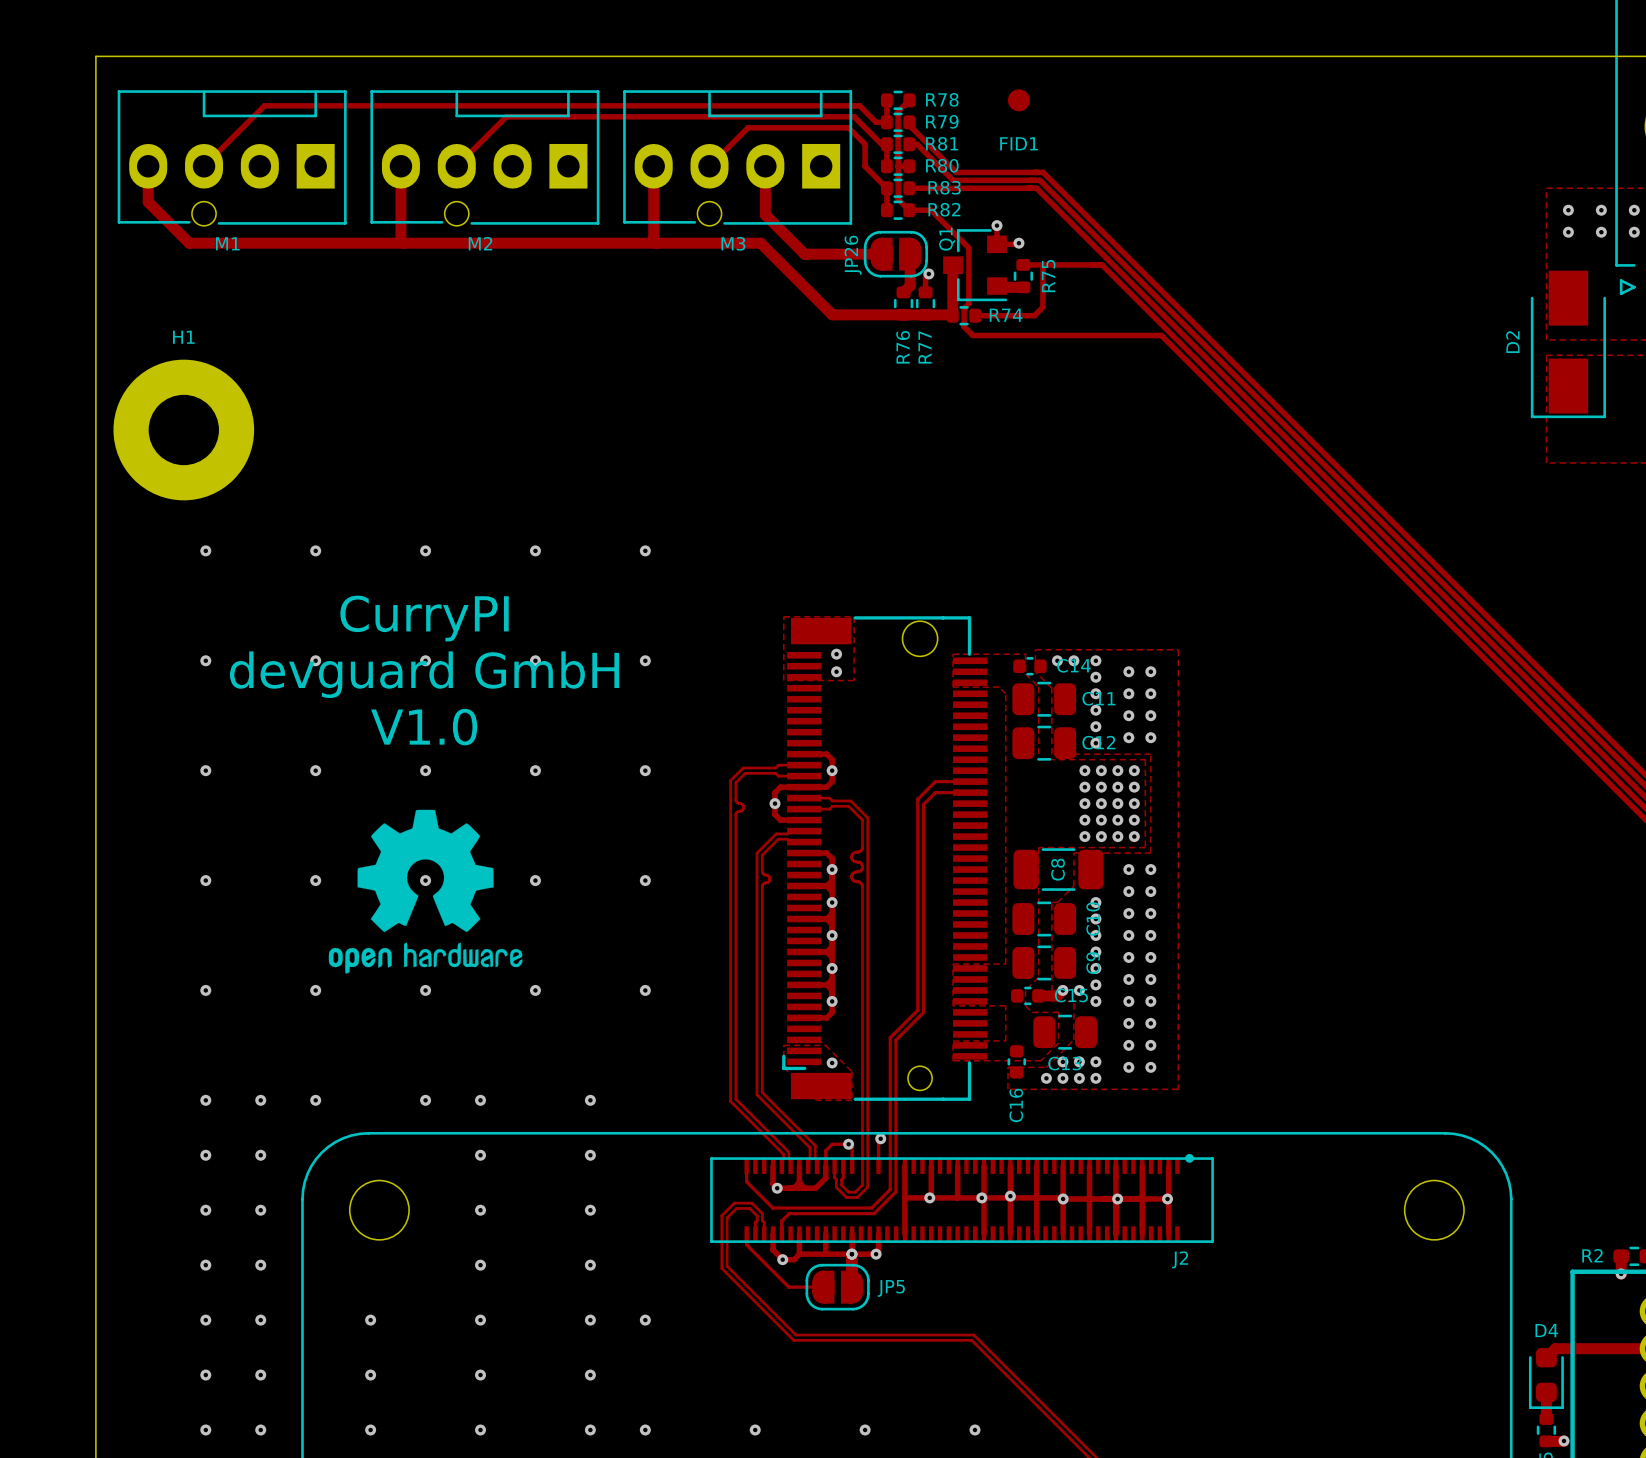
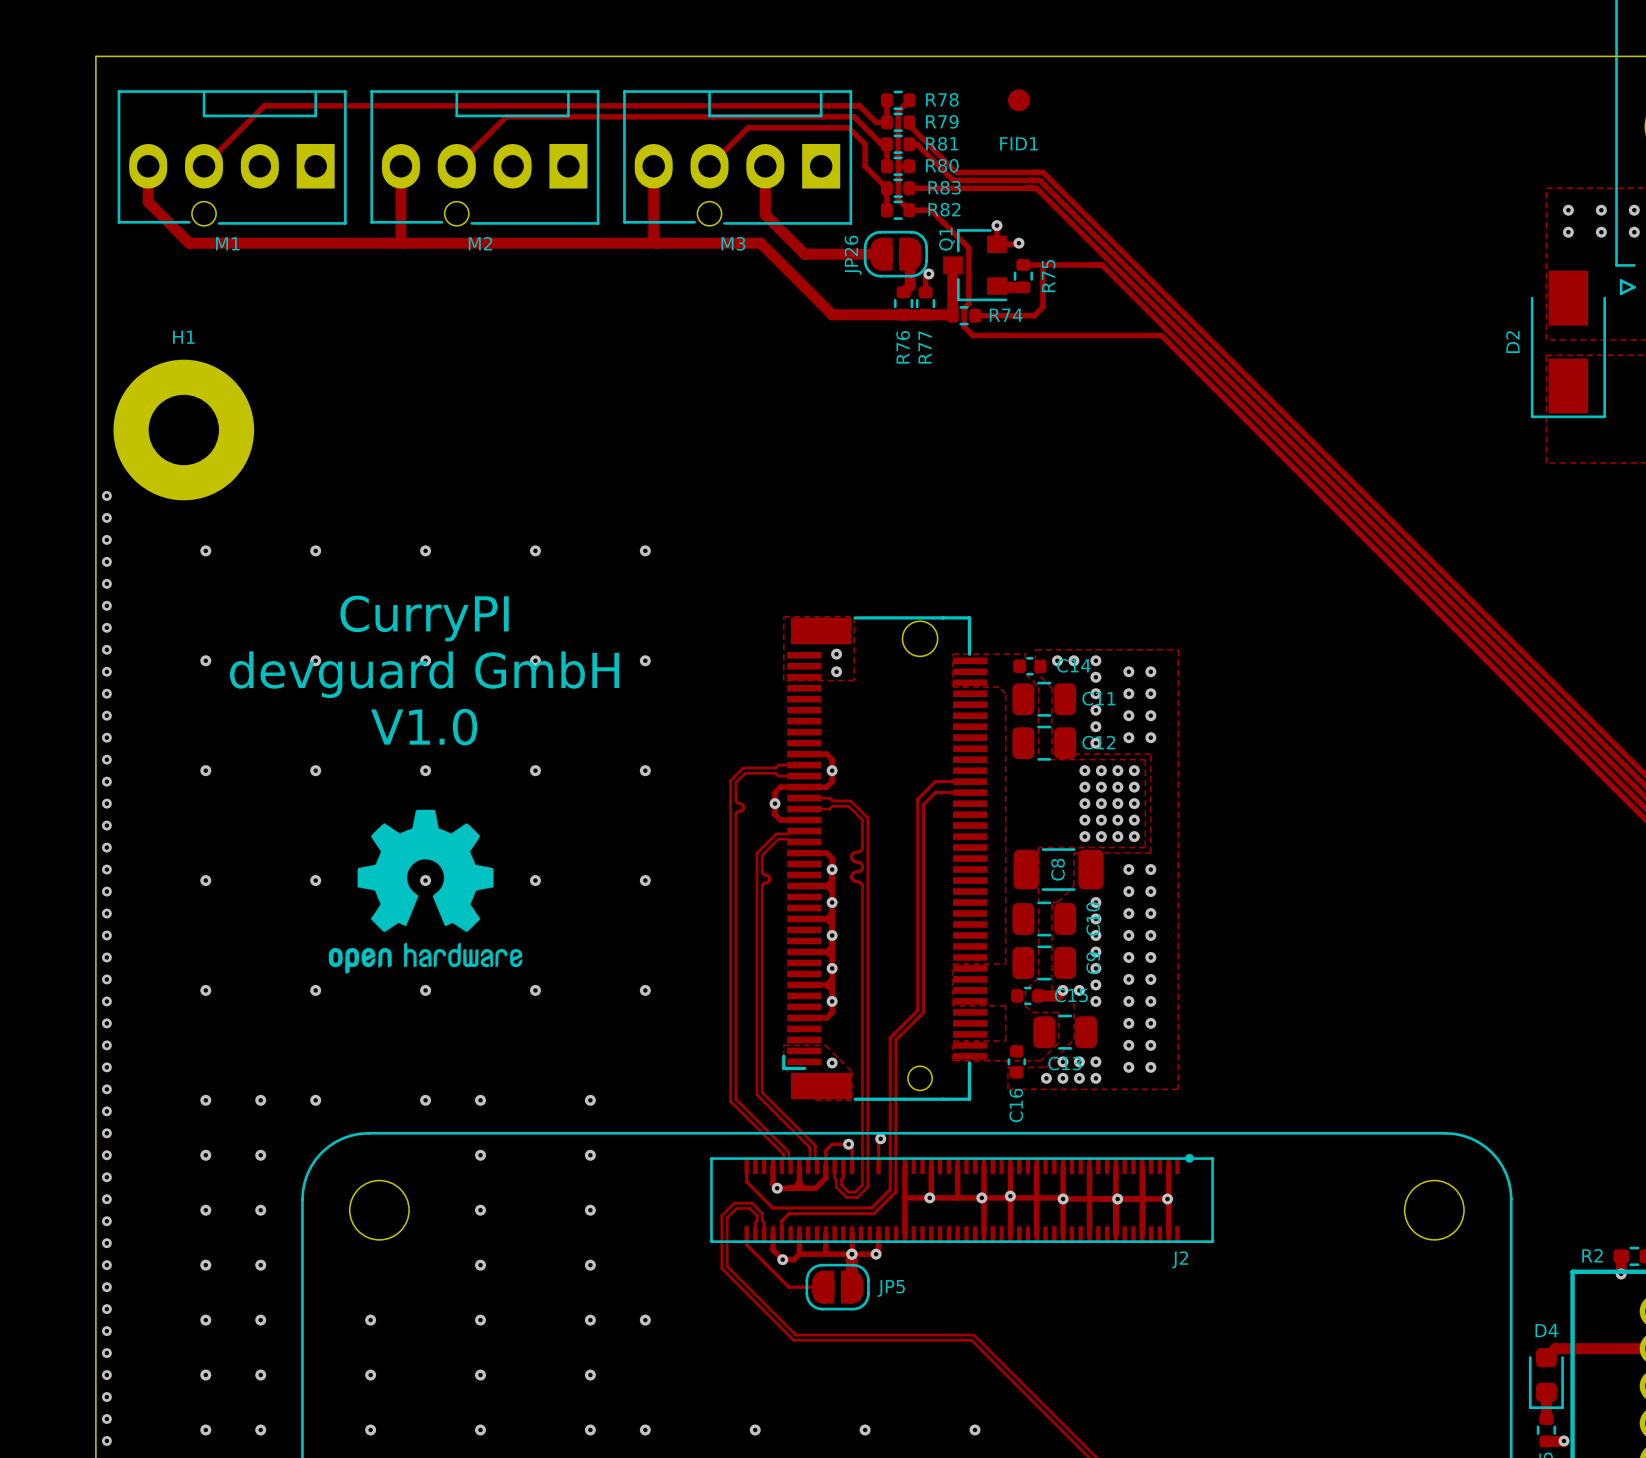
via: none -> (106, 495)
via: none -> (106, 517)
via: none -> (106, 539)
via: none -> (106, 561)
via: none -> (106, 583)
via: none -> (106, 605)
via: none -> (106, 627)
via: none -> (106, 649)
via: none -> (106, 671)
via: none -> (106, 693)
via: none -> (106, 715)
via: none -> (106, 737)
via: none -> (106, 759)
via: none -> (106, 781)
via: none -> (106, 803)
via: none -> (106, 825)
via: none -> (106, 847)
via: none -> (106, 869)
via: none -> (106, 891)
via: none -> (106, 913)
via: none -> (106, 935)
via: none -> (106, 957)
via: none -> (106, 979)
via: none -> (106, 1001)
via: none -> (106, 1023)
via: none -> (106, 1045)
via: none -> (106, 1067)
via: none -> (106, 1089)
via: none -> (106, 1111)
via: none -> (106, 1133)
via: none -> (106, 1155)
via: none -> (106, 1177)
via: none -> (106, 1199)
via: none -> (106, 1221)
via: none -> (106, 1243)
via: none -> (106, 1265)
via: none -> (106, 1287)
via: none -> (106, 1309)
via: none -> (106, 1331)
via: none -> (106, 1353)
via: none -> (106, 1375)
via: none -> (106, 1397)
via: none -> (106, 1419)
via: none -> (106, 1440)

